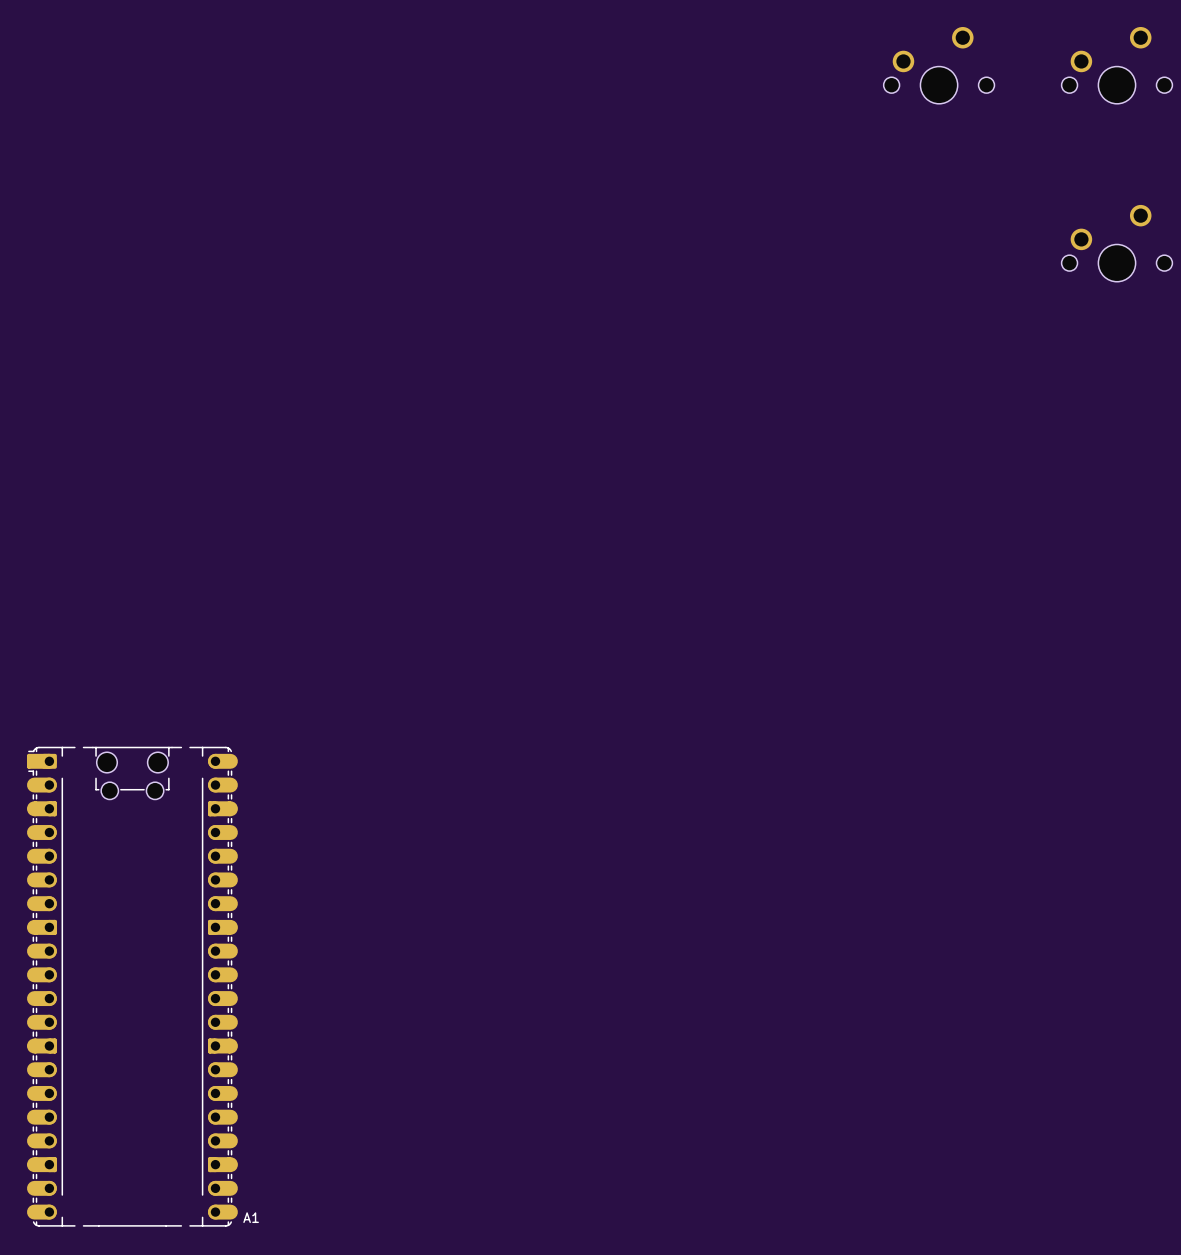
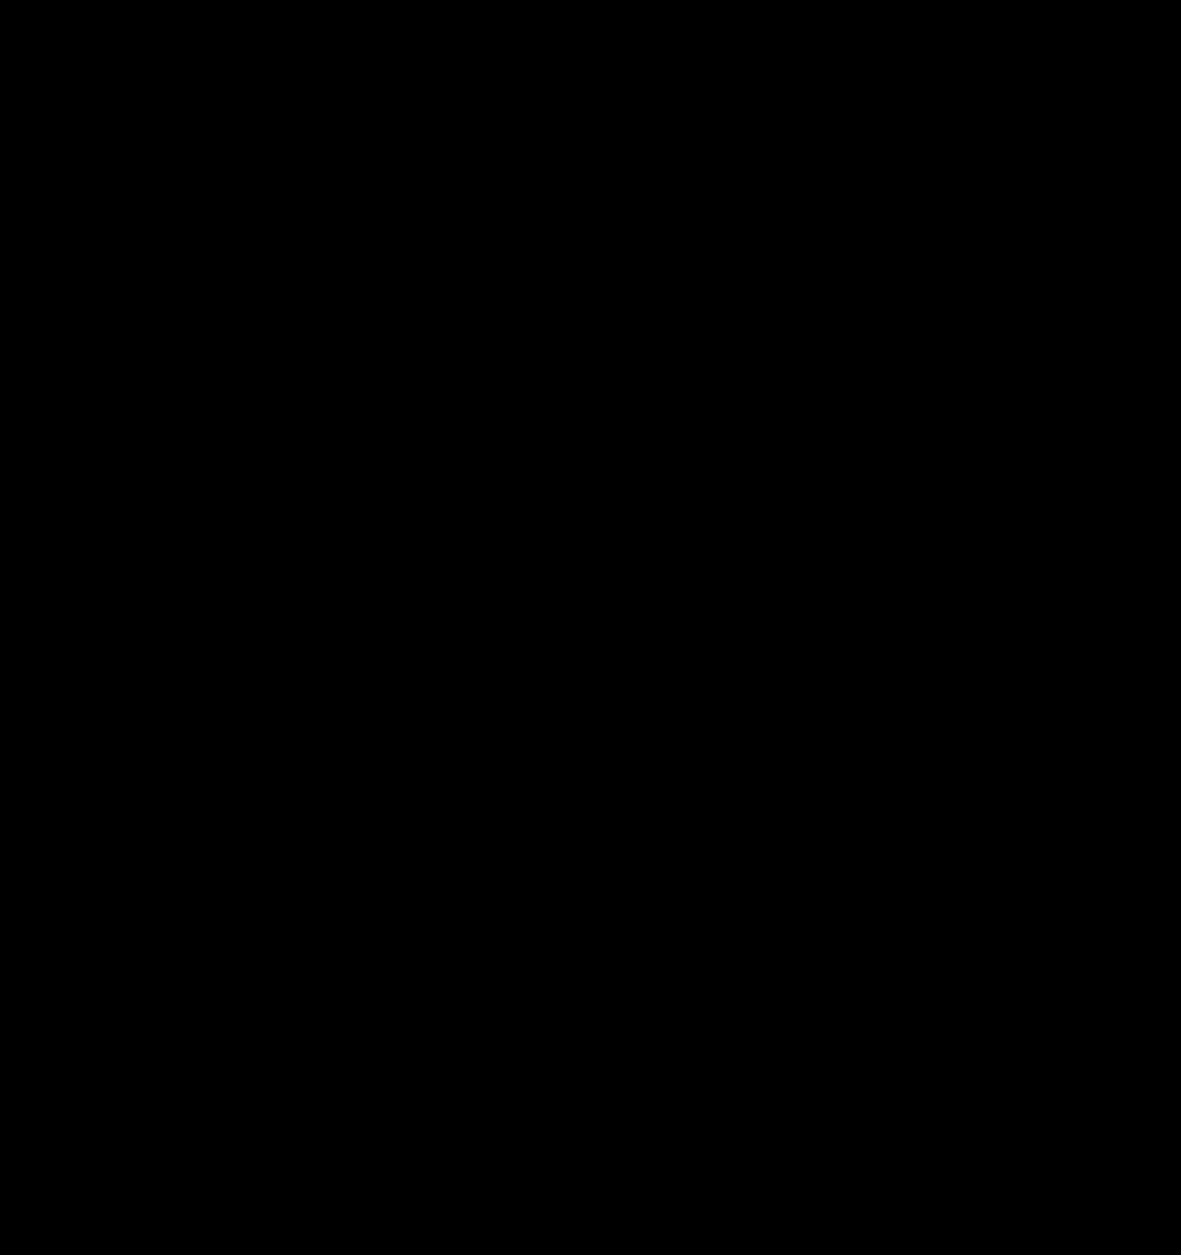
part: (939, 65) -> none
part: (1117, 65) -> none
part: (1117, 243) -> none
A1: (132, 986) -> none

